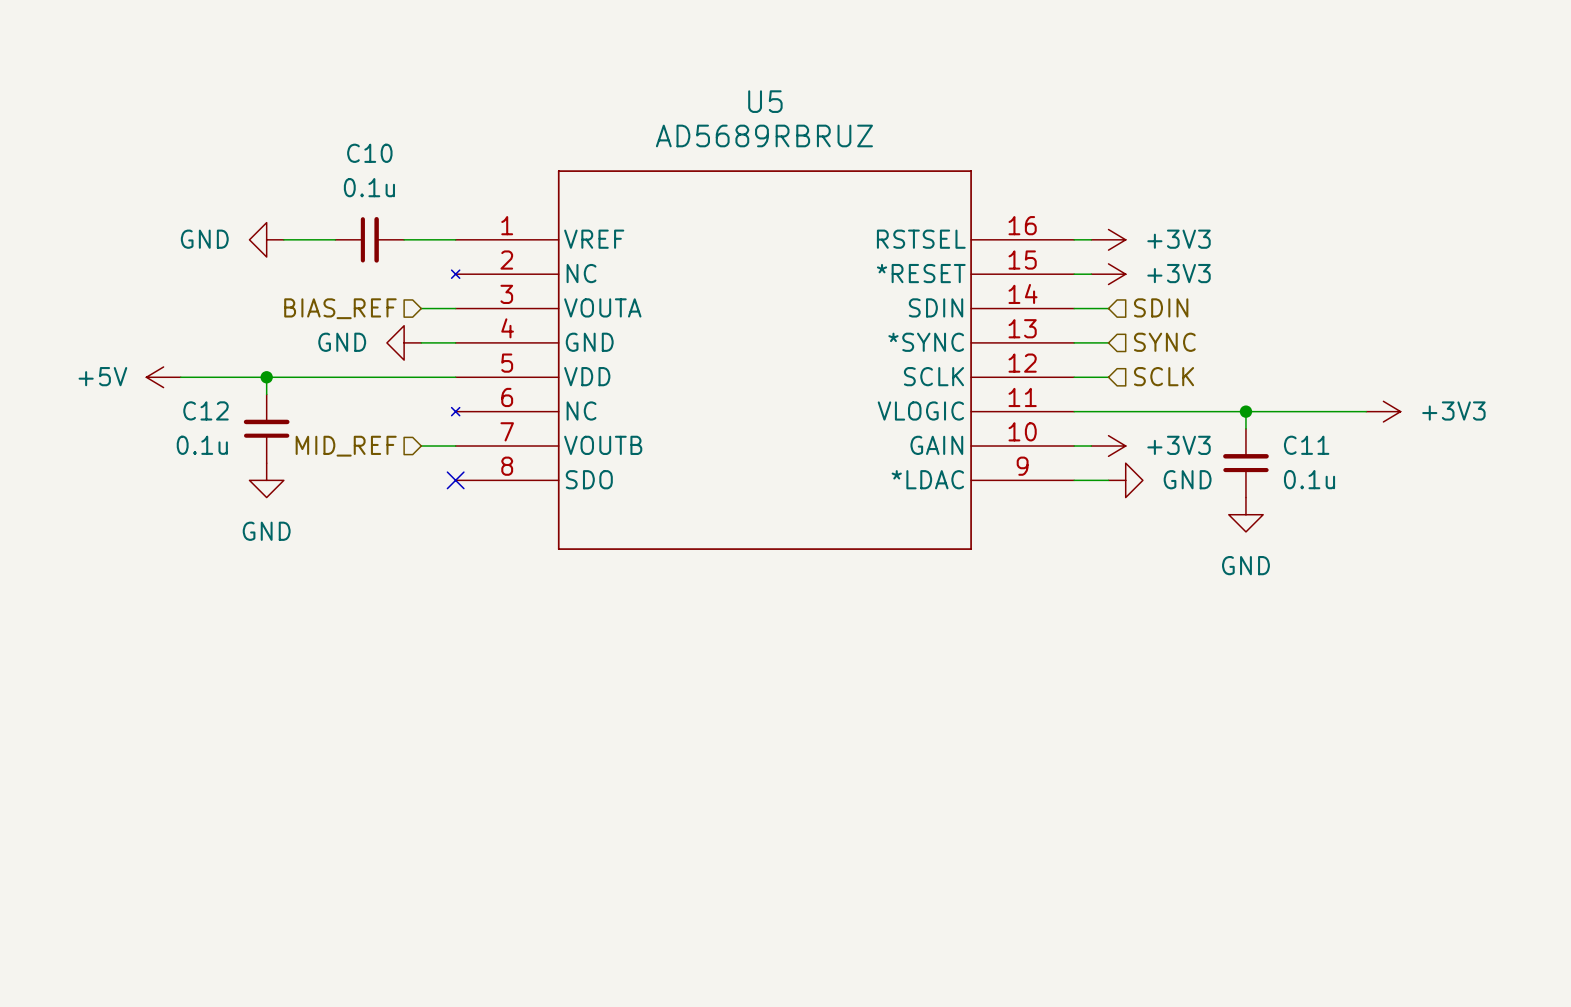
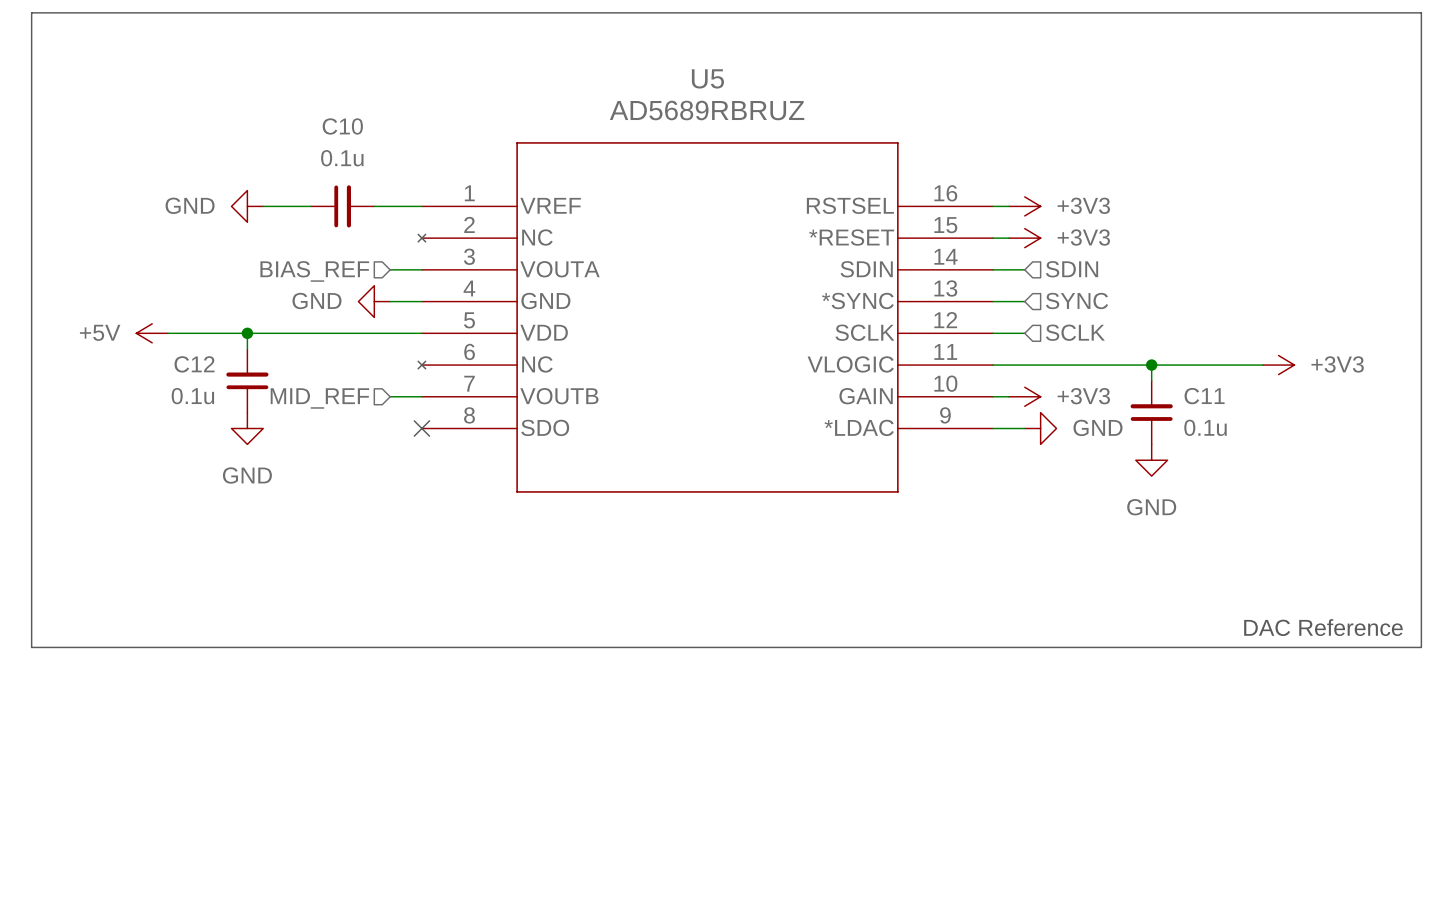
line: none -> (31, 12) (1421, 12) (1421, 647) (31, 647) (31, 12)
text: none -> DAC Reference (1323, 627)

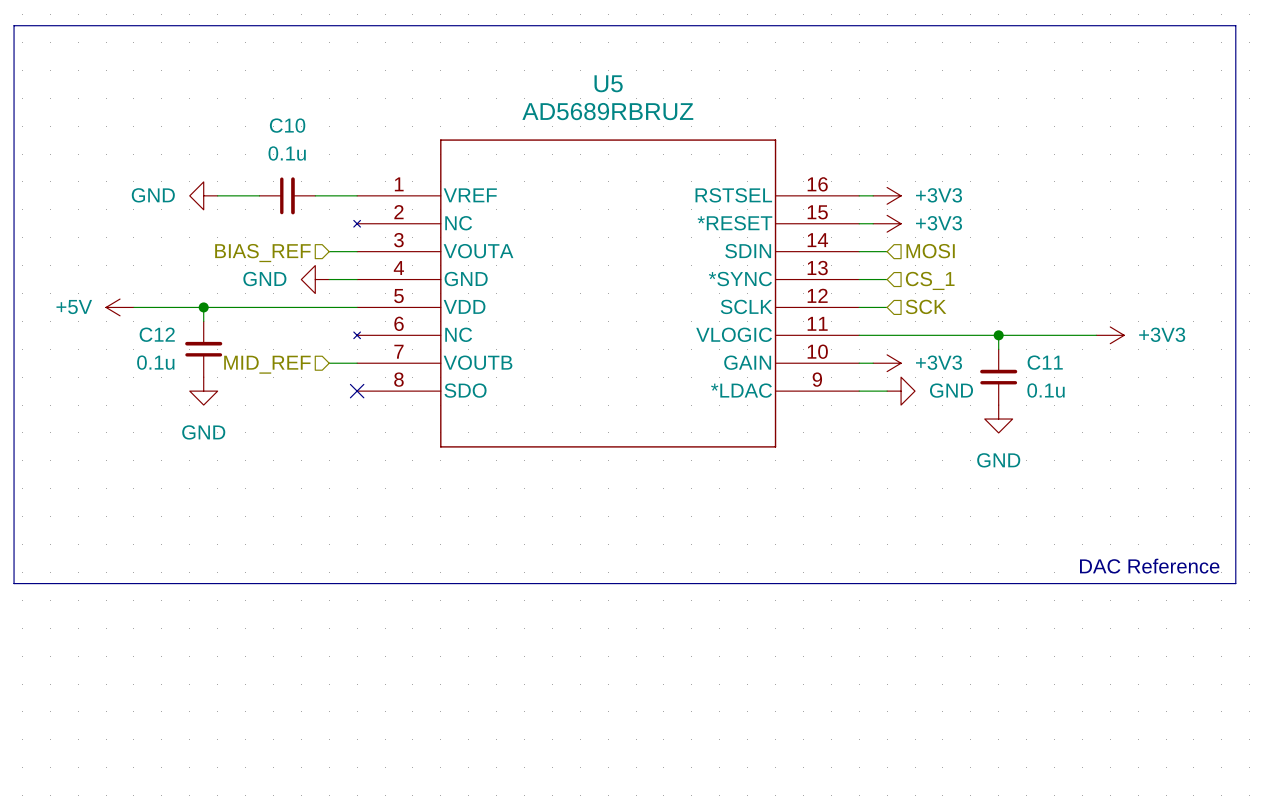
hierarchical label: SDIN (1072, 269) -> MOSI (930, 251)
hierarchical label: SYNC (1077, 300) -> CS_1 (930, 280)
hierarchical label: SCLK (1075, 332) -> SCK (926, 306)

